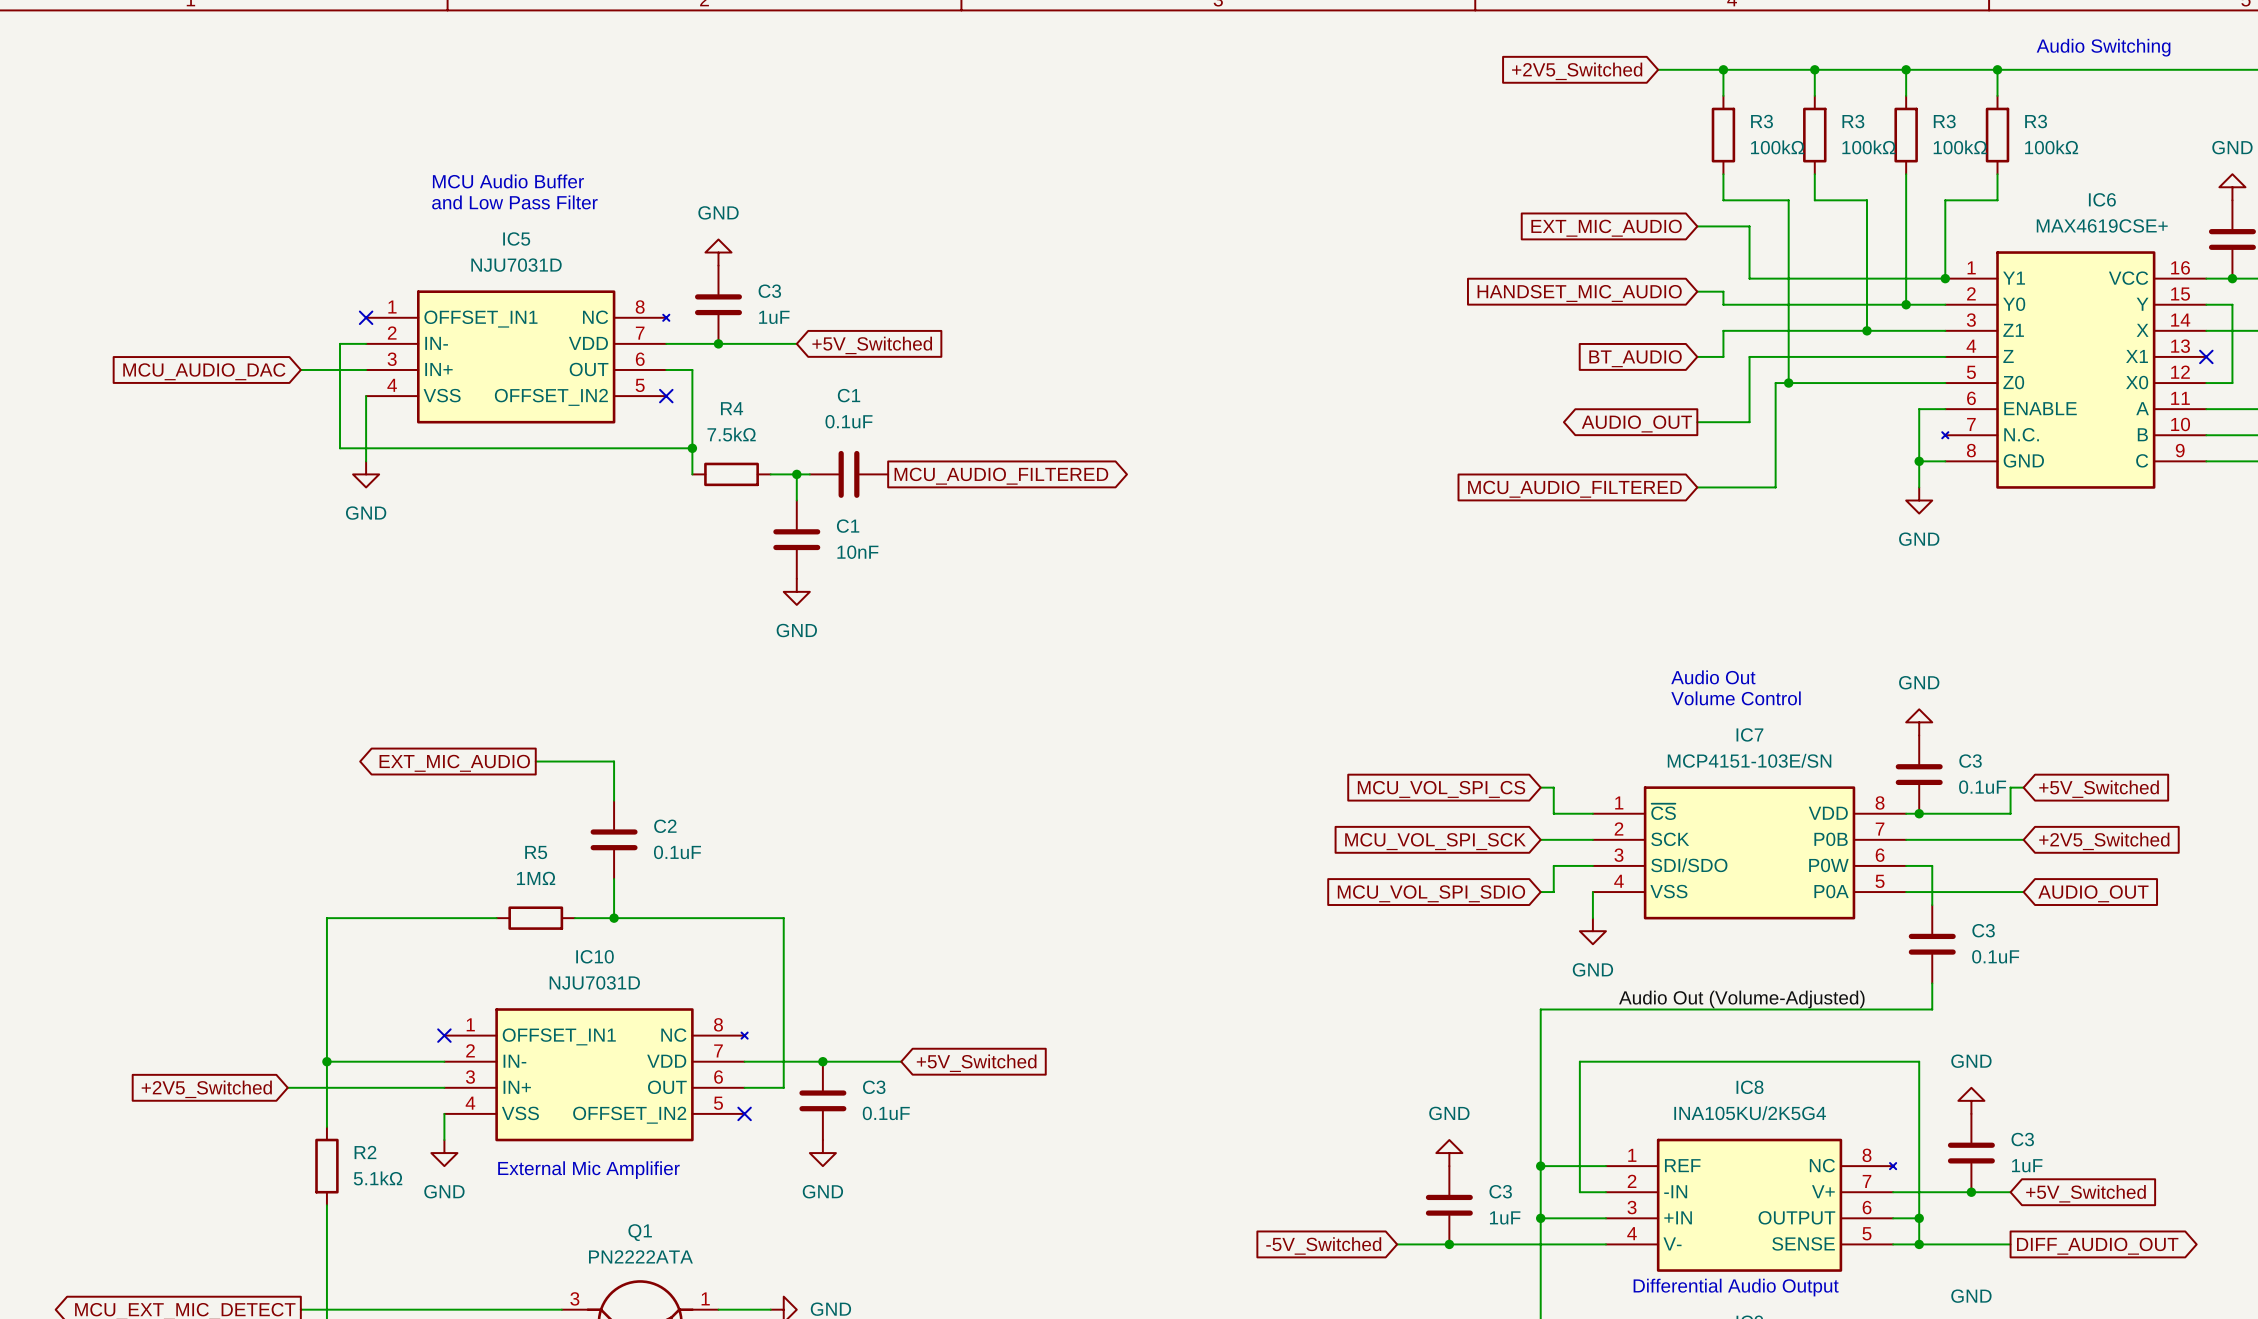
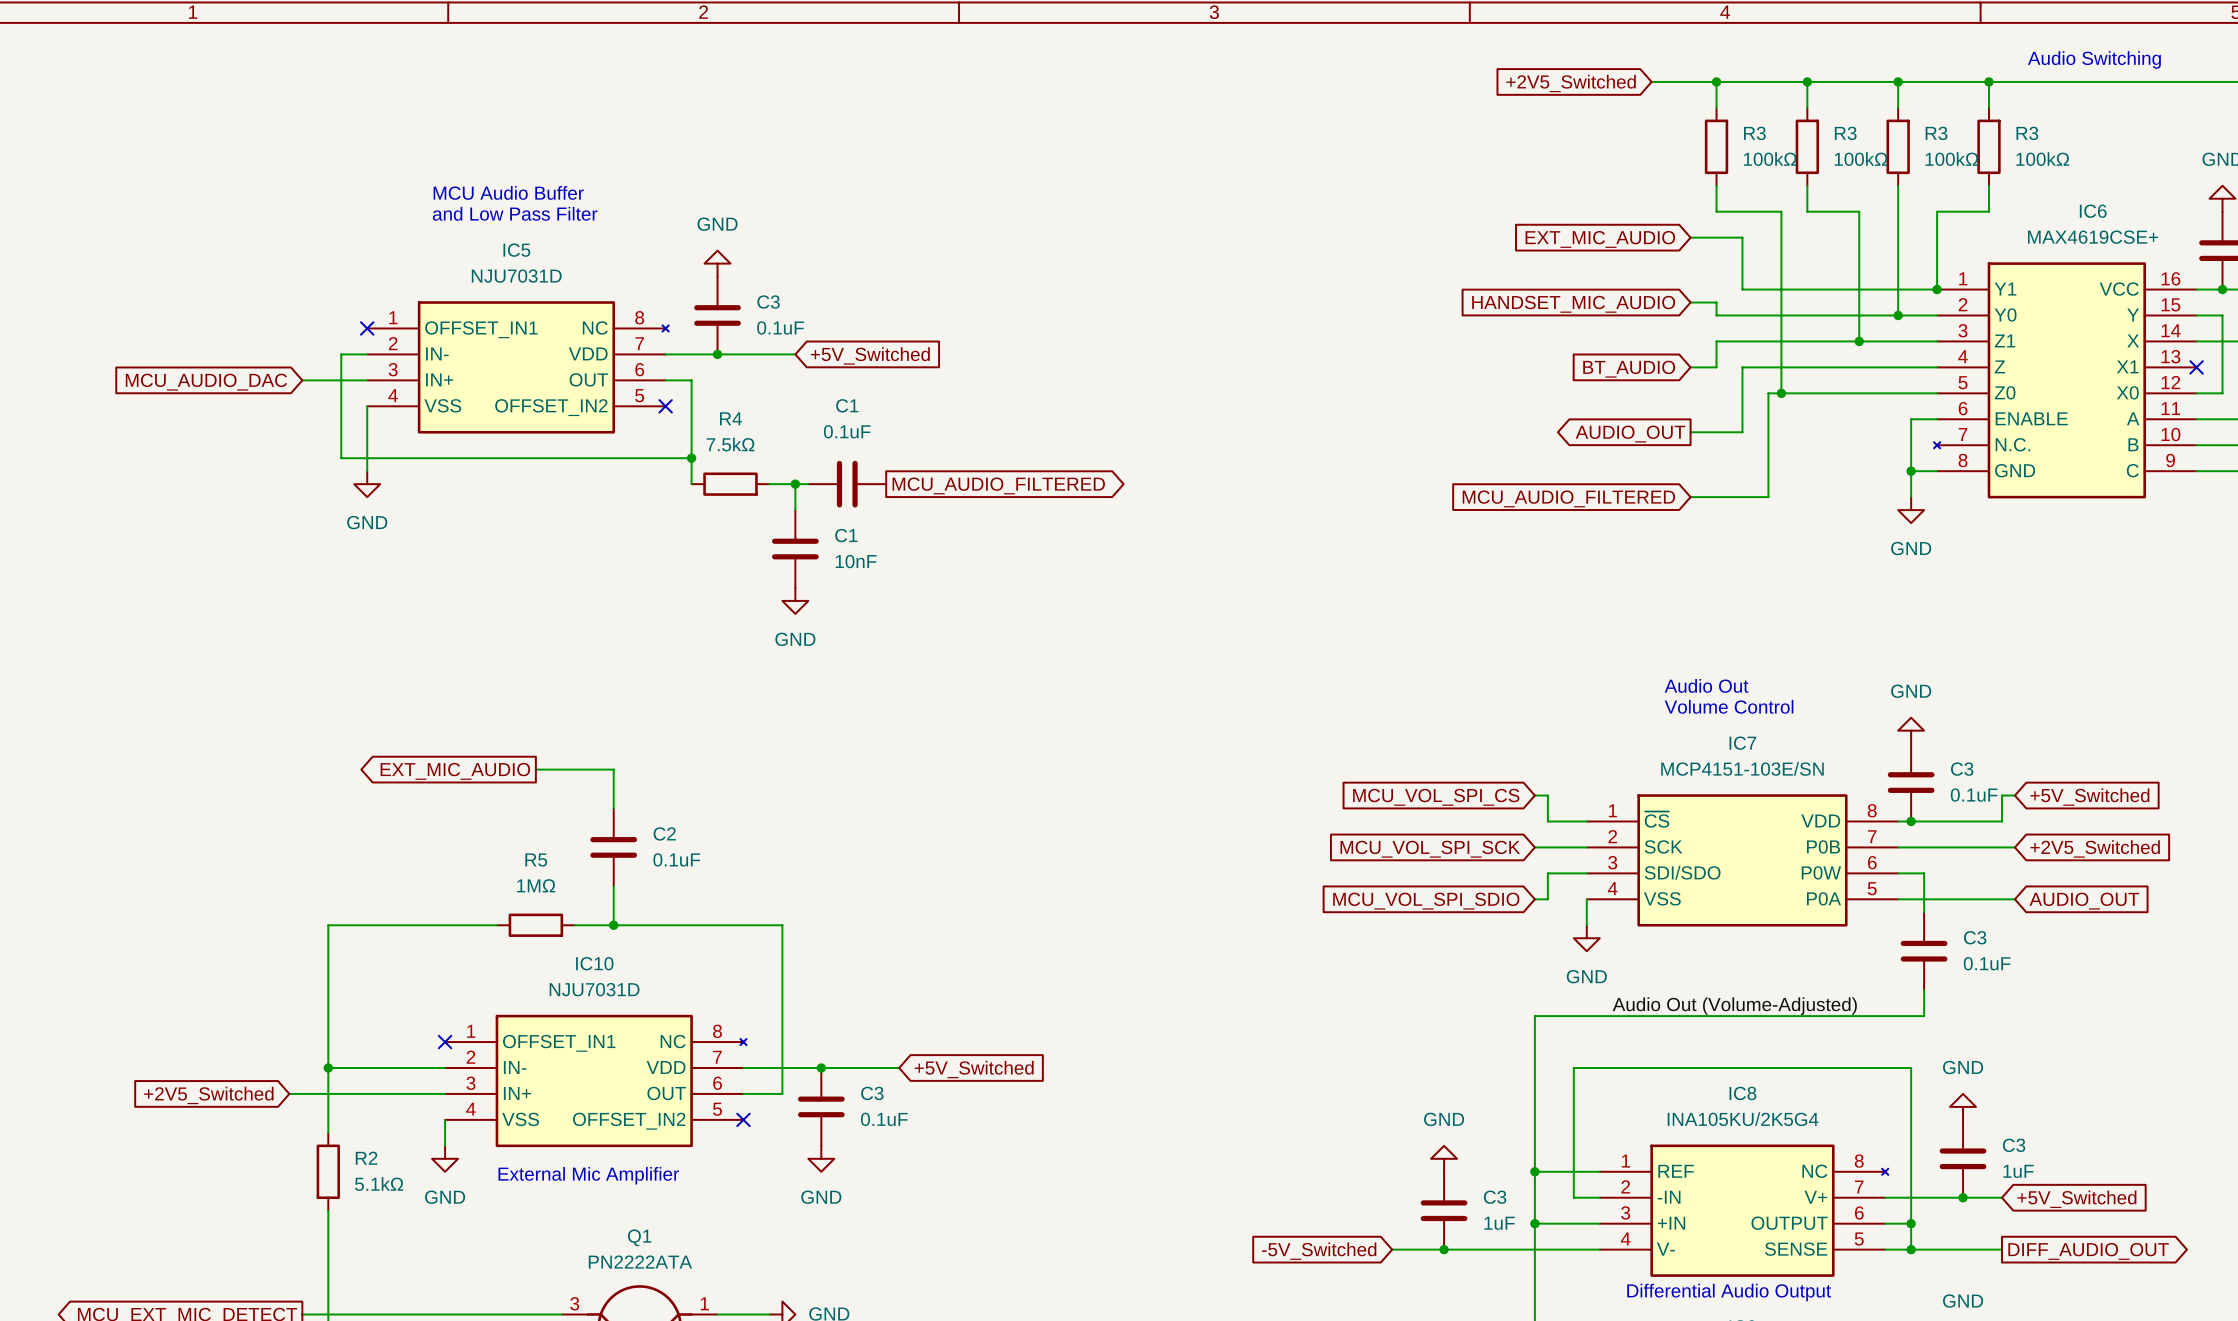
C3 value: 1uF (774, 317) -> 0.1uF (780, 327)

